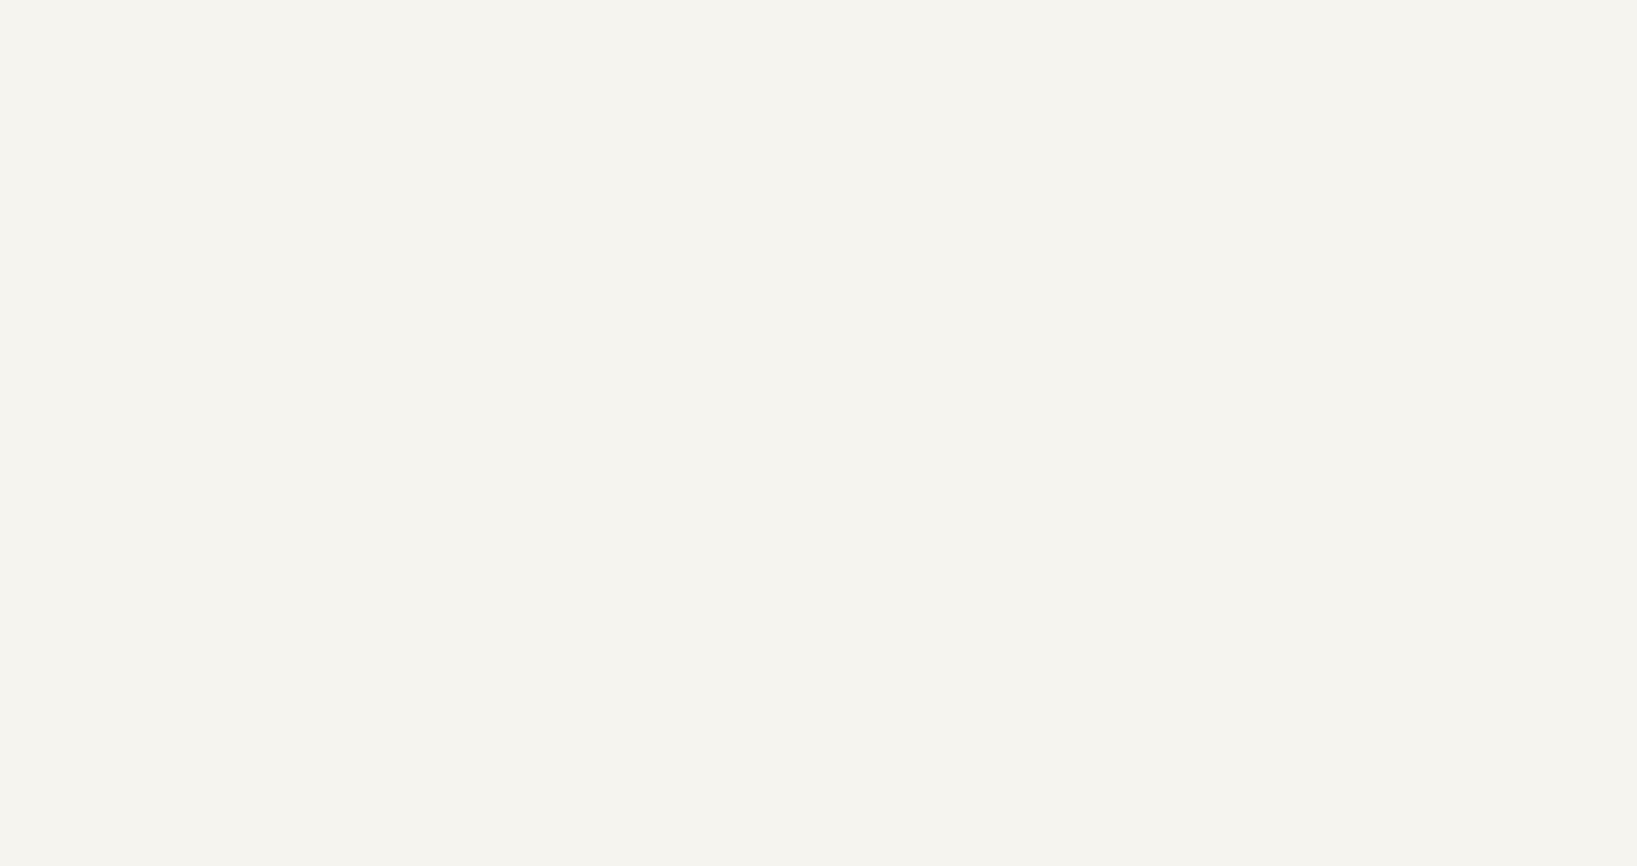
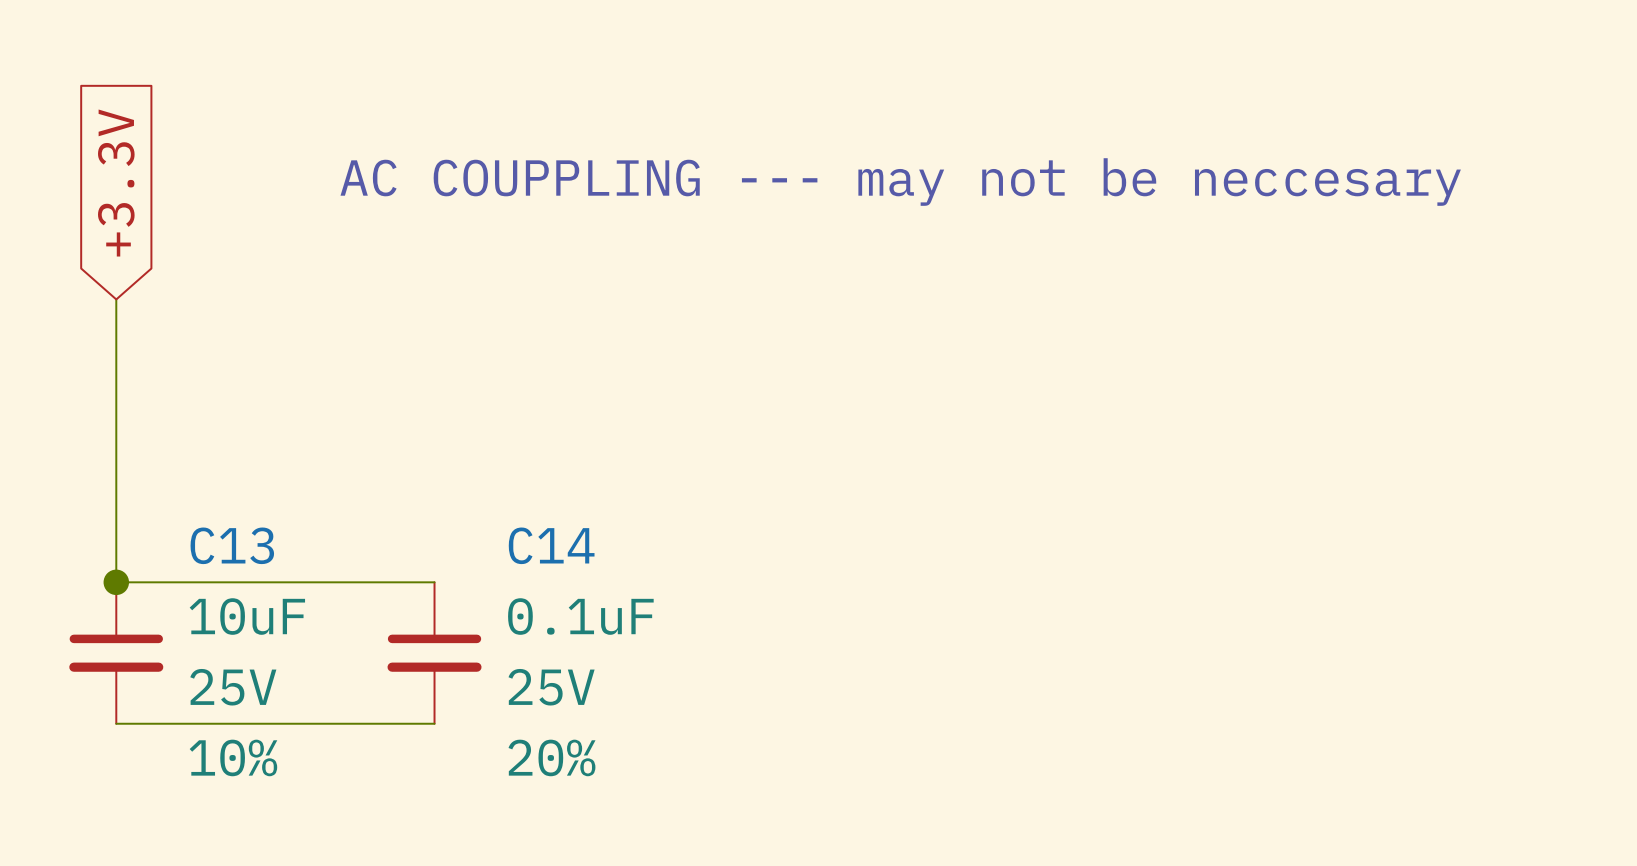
global label: none -> +3.3V (116, 183)
text: none -> AC COUPPLING --- may not be neccesary (900, 182)
wire: none -> (116, 299) (116, 582) (434, 582)
junction: none -> (116, 582)
C13: none -> 10uF (116, 653)
C14: none -> 0.1uF (434, 653)
wire: none -> (116, 723) (434, 723)

